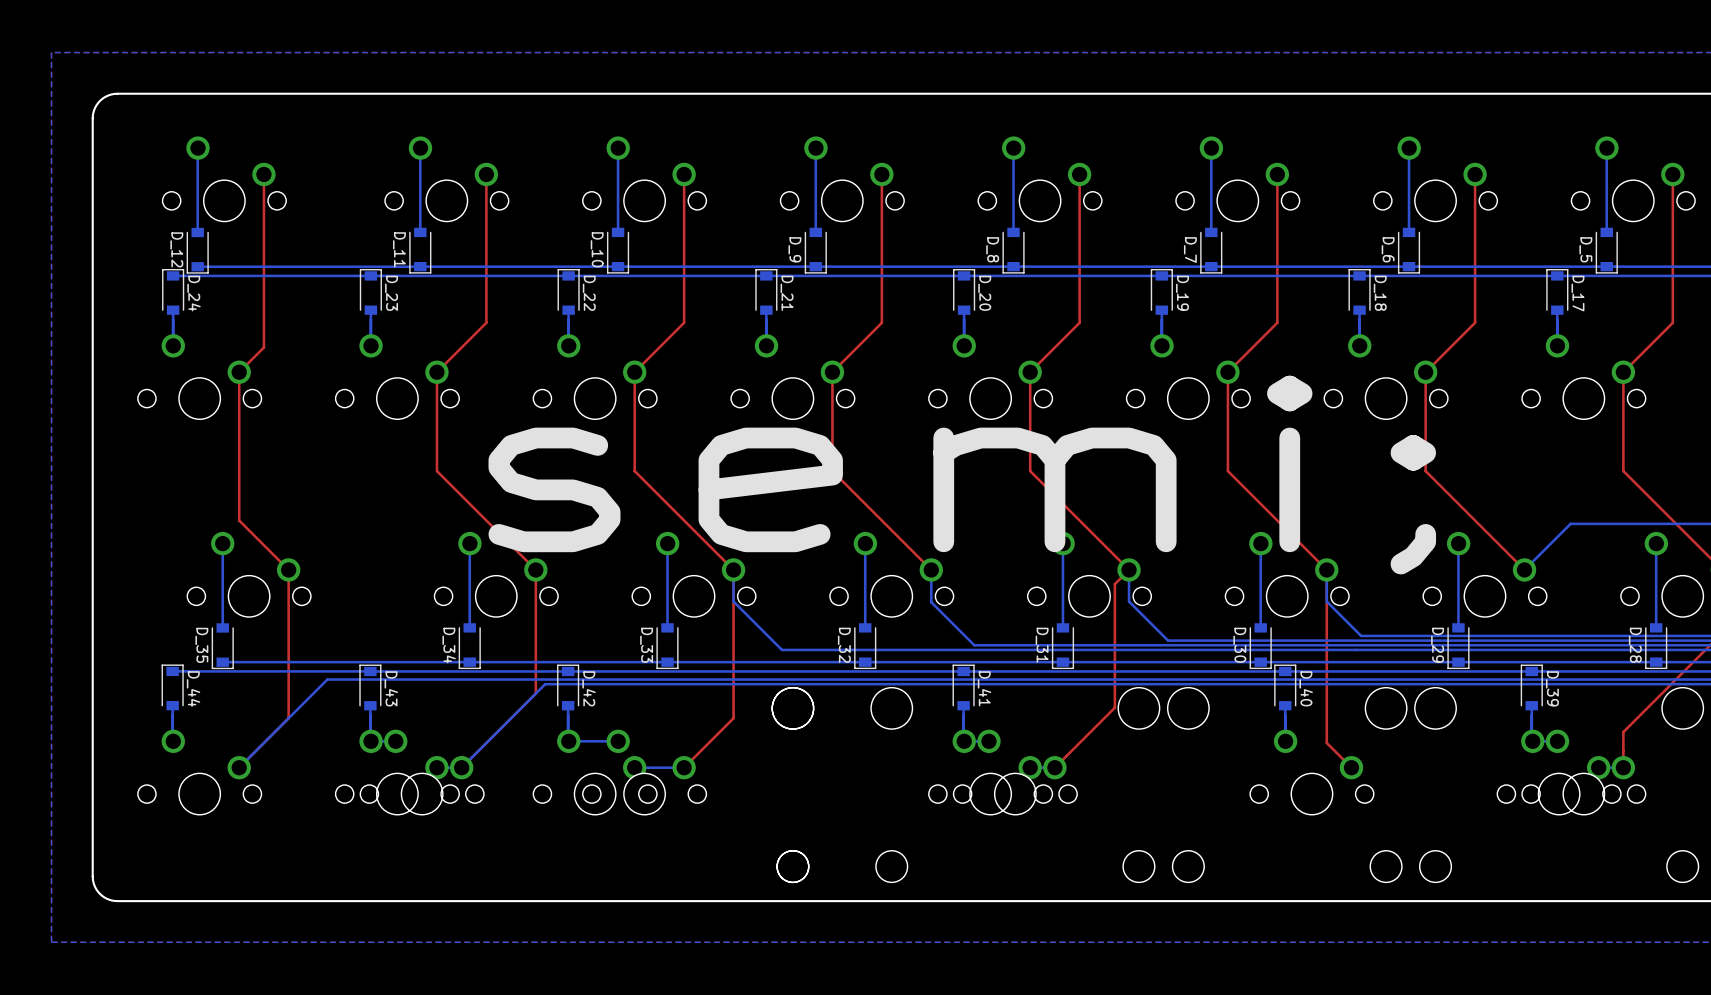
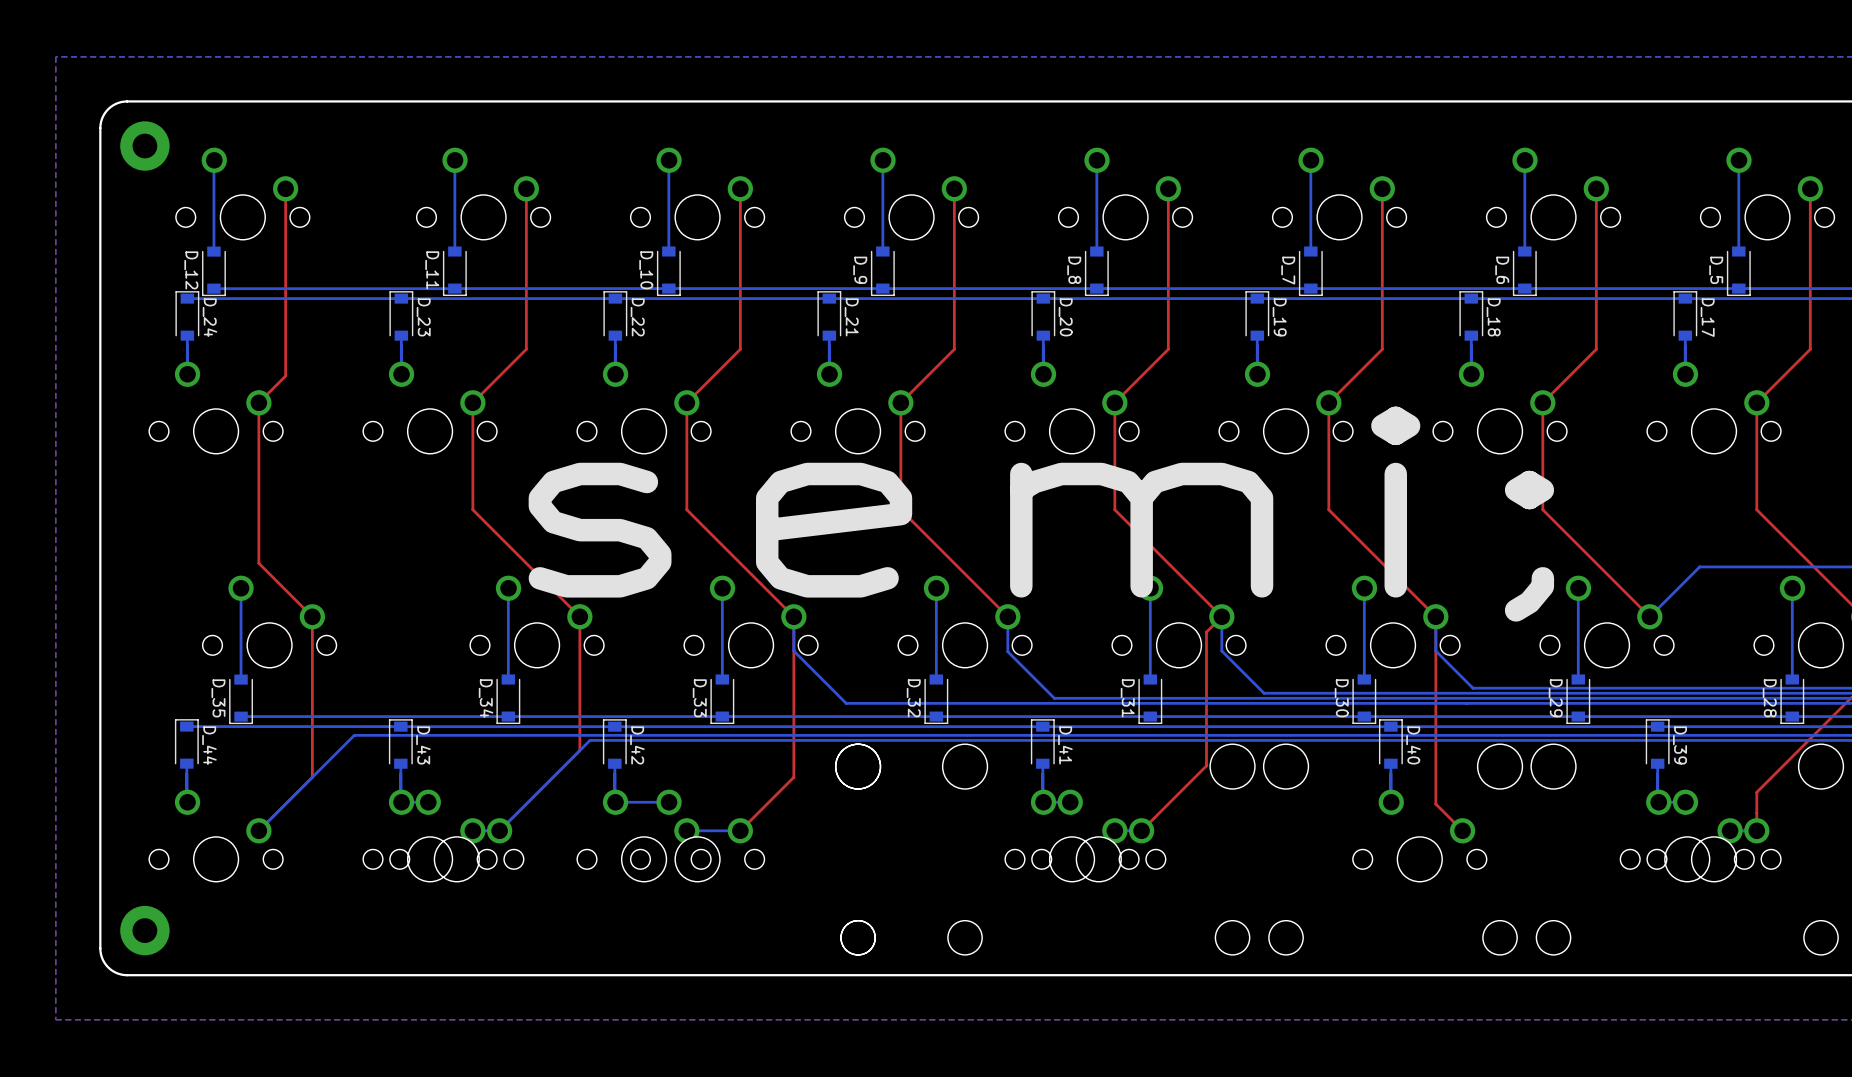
part: none -> (144, 146)
part: none -> (144, 930)

